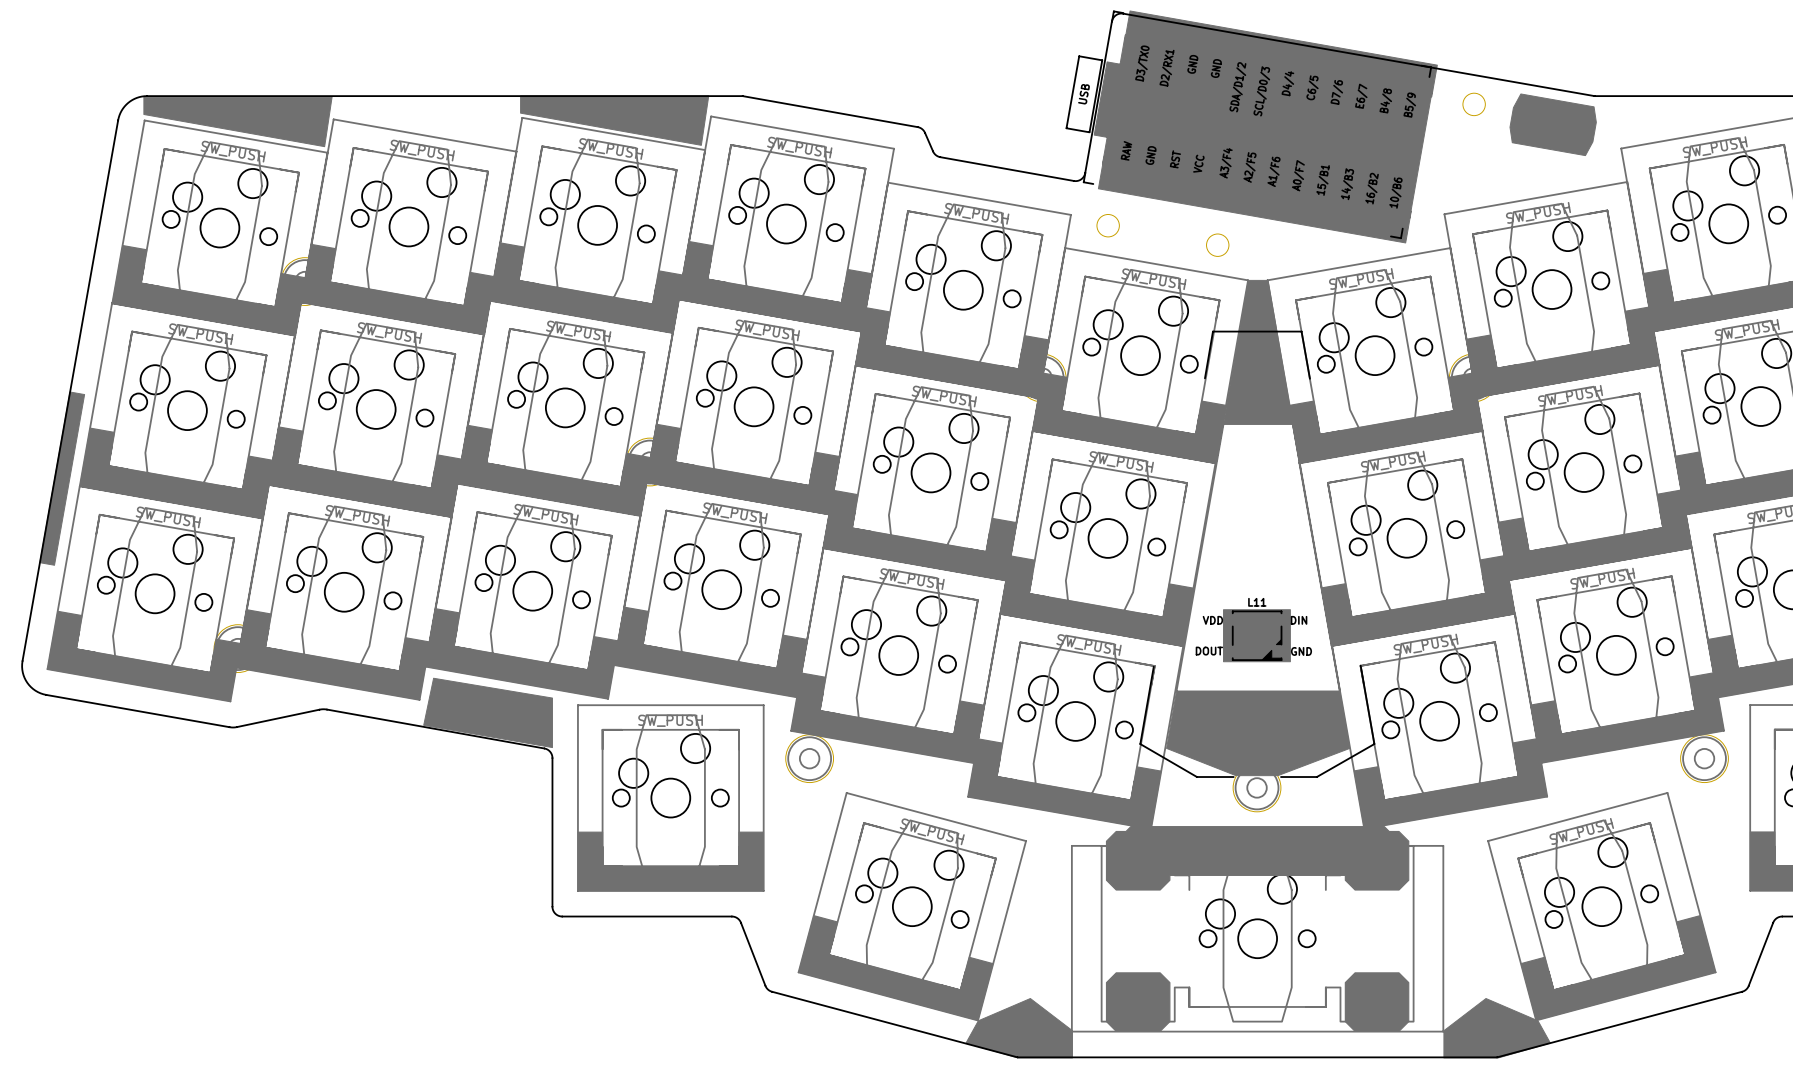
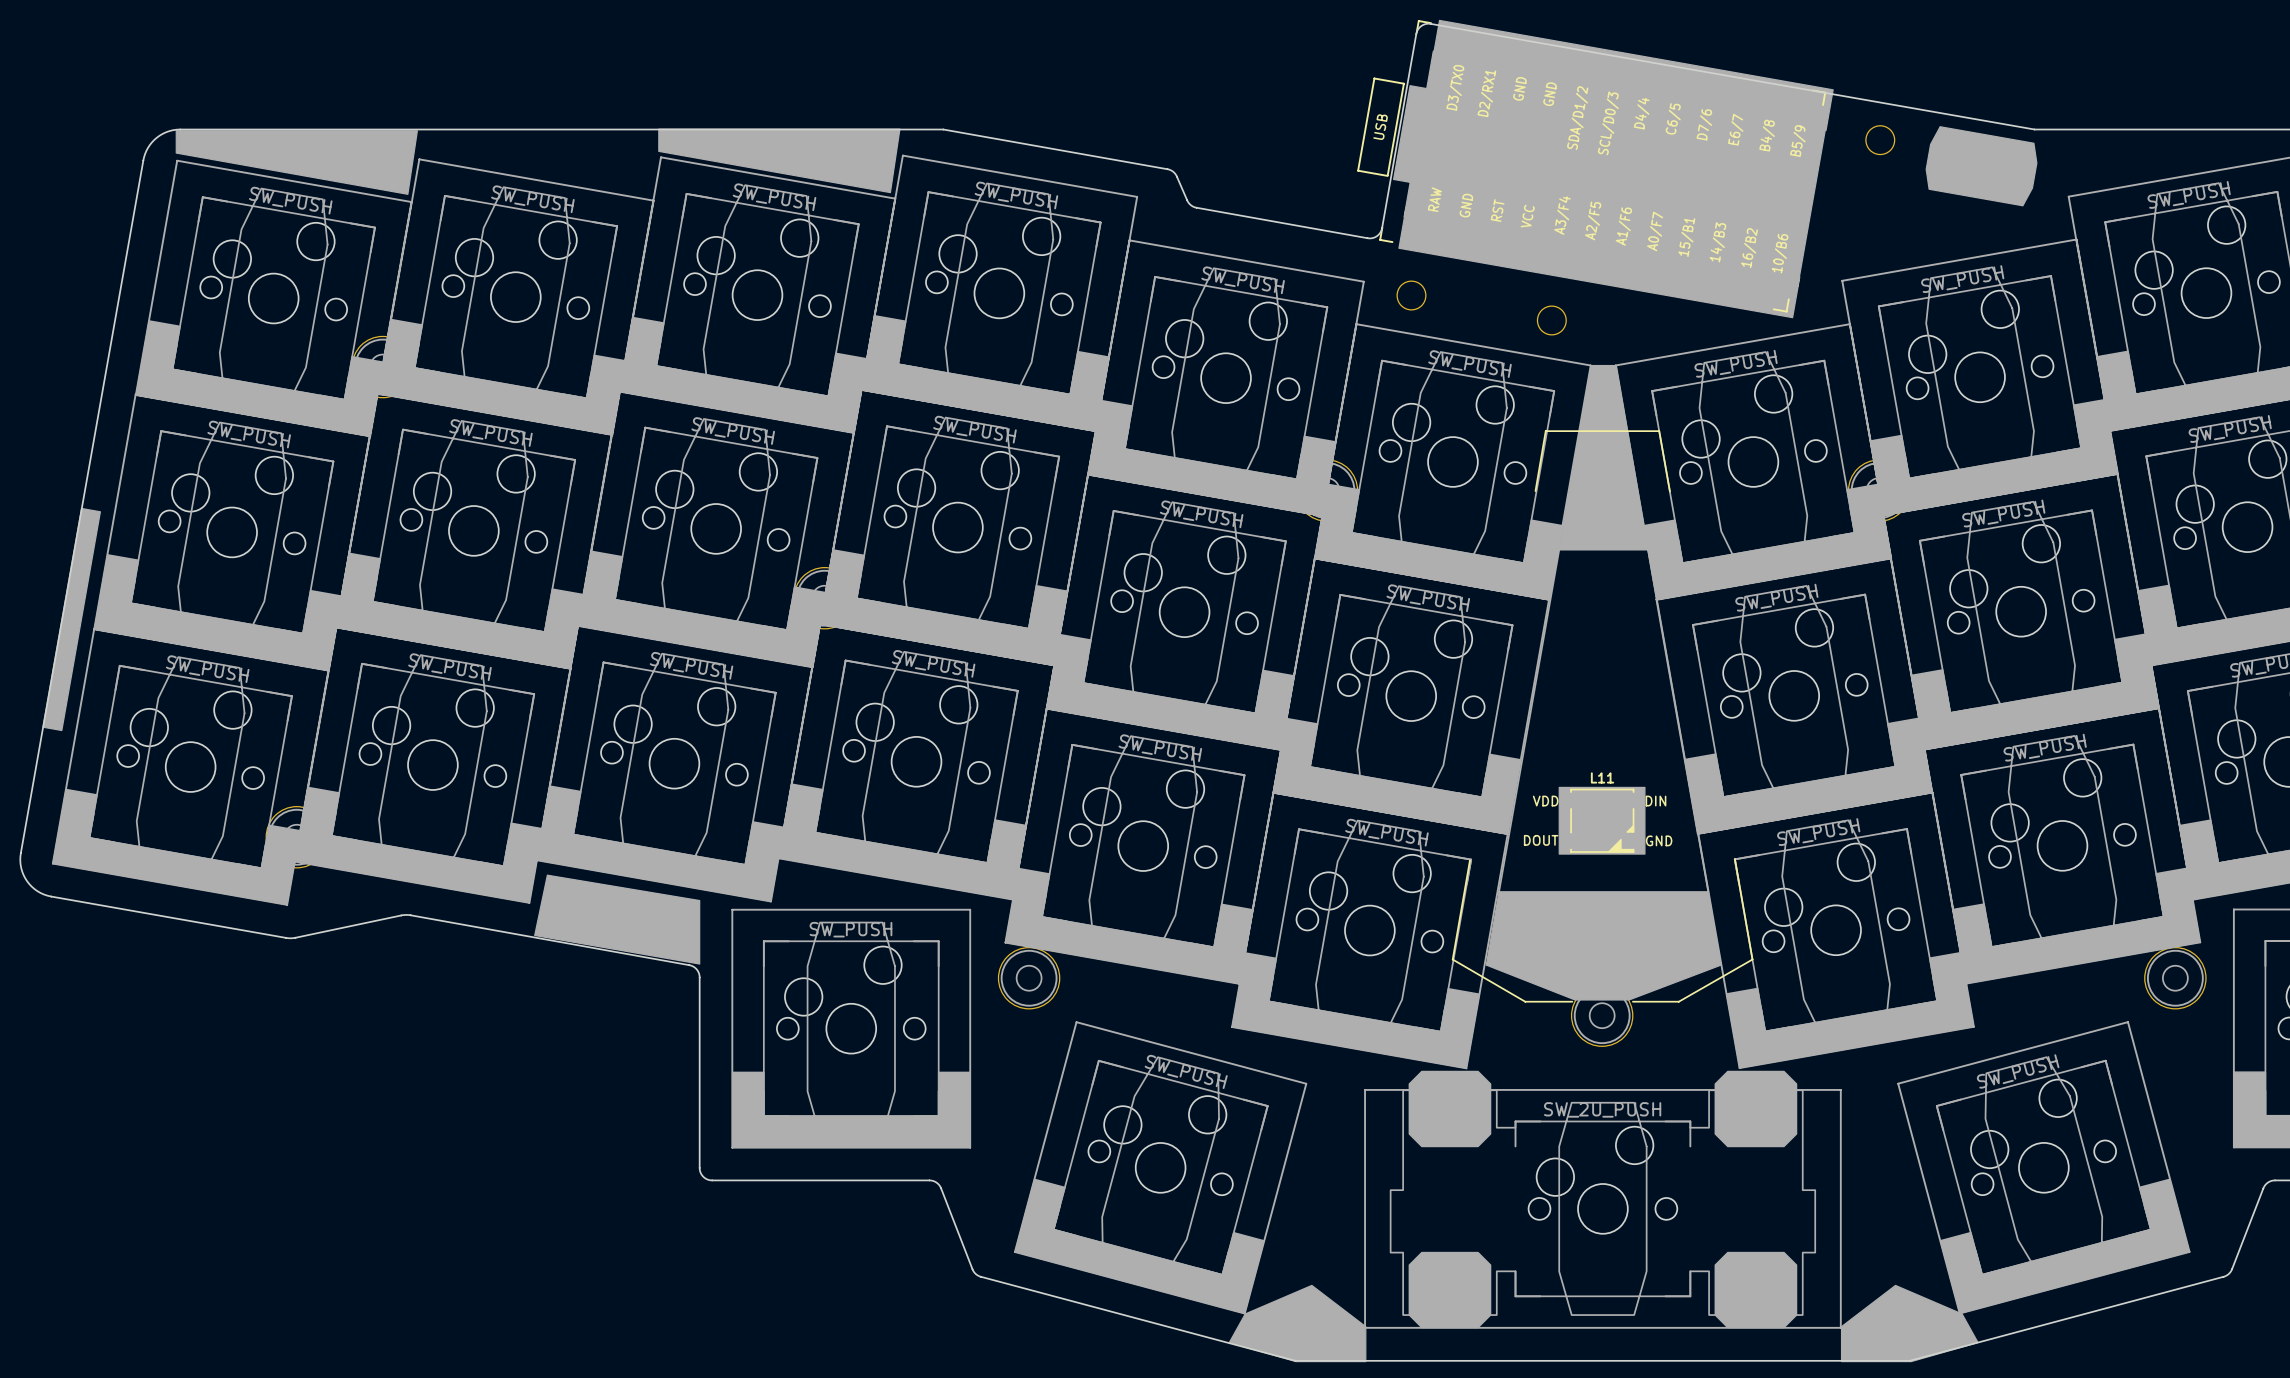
part footprint: [1071, 826, 1445, 1033] -> [1364, 1070, 1842, 1329]

